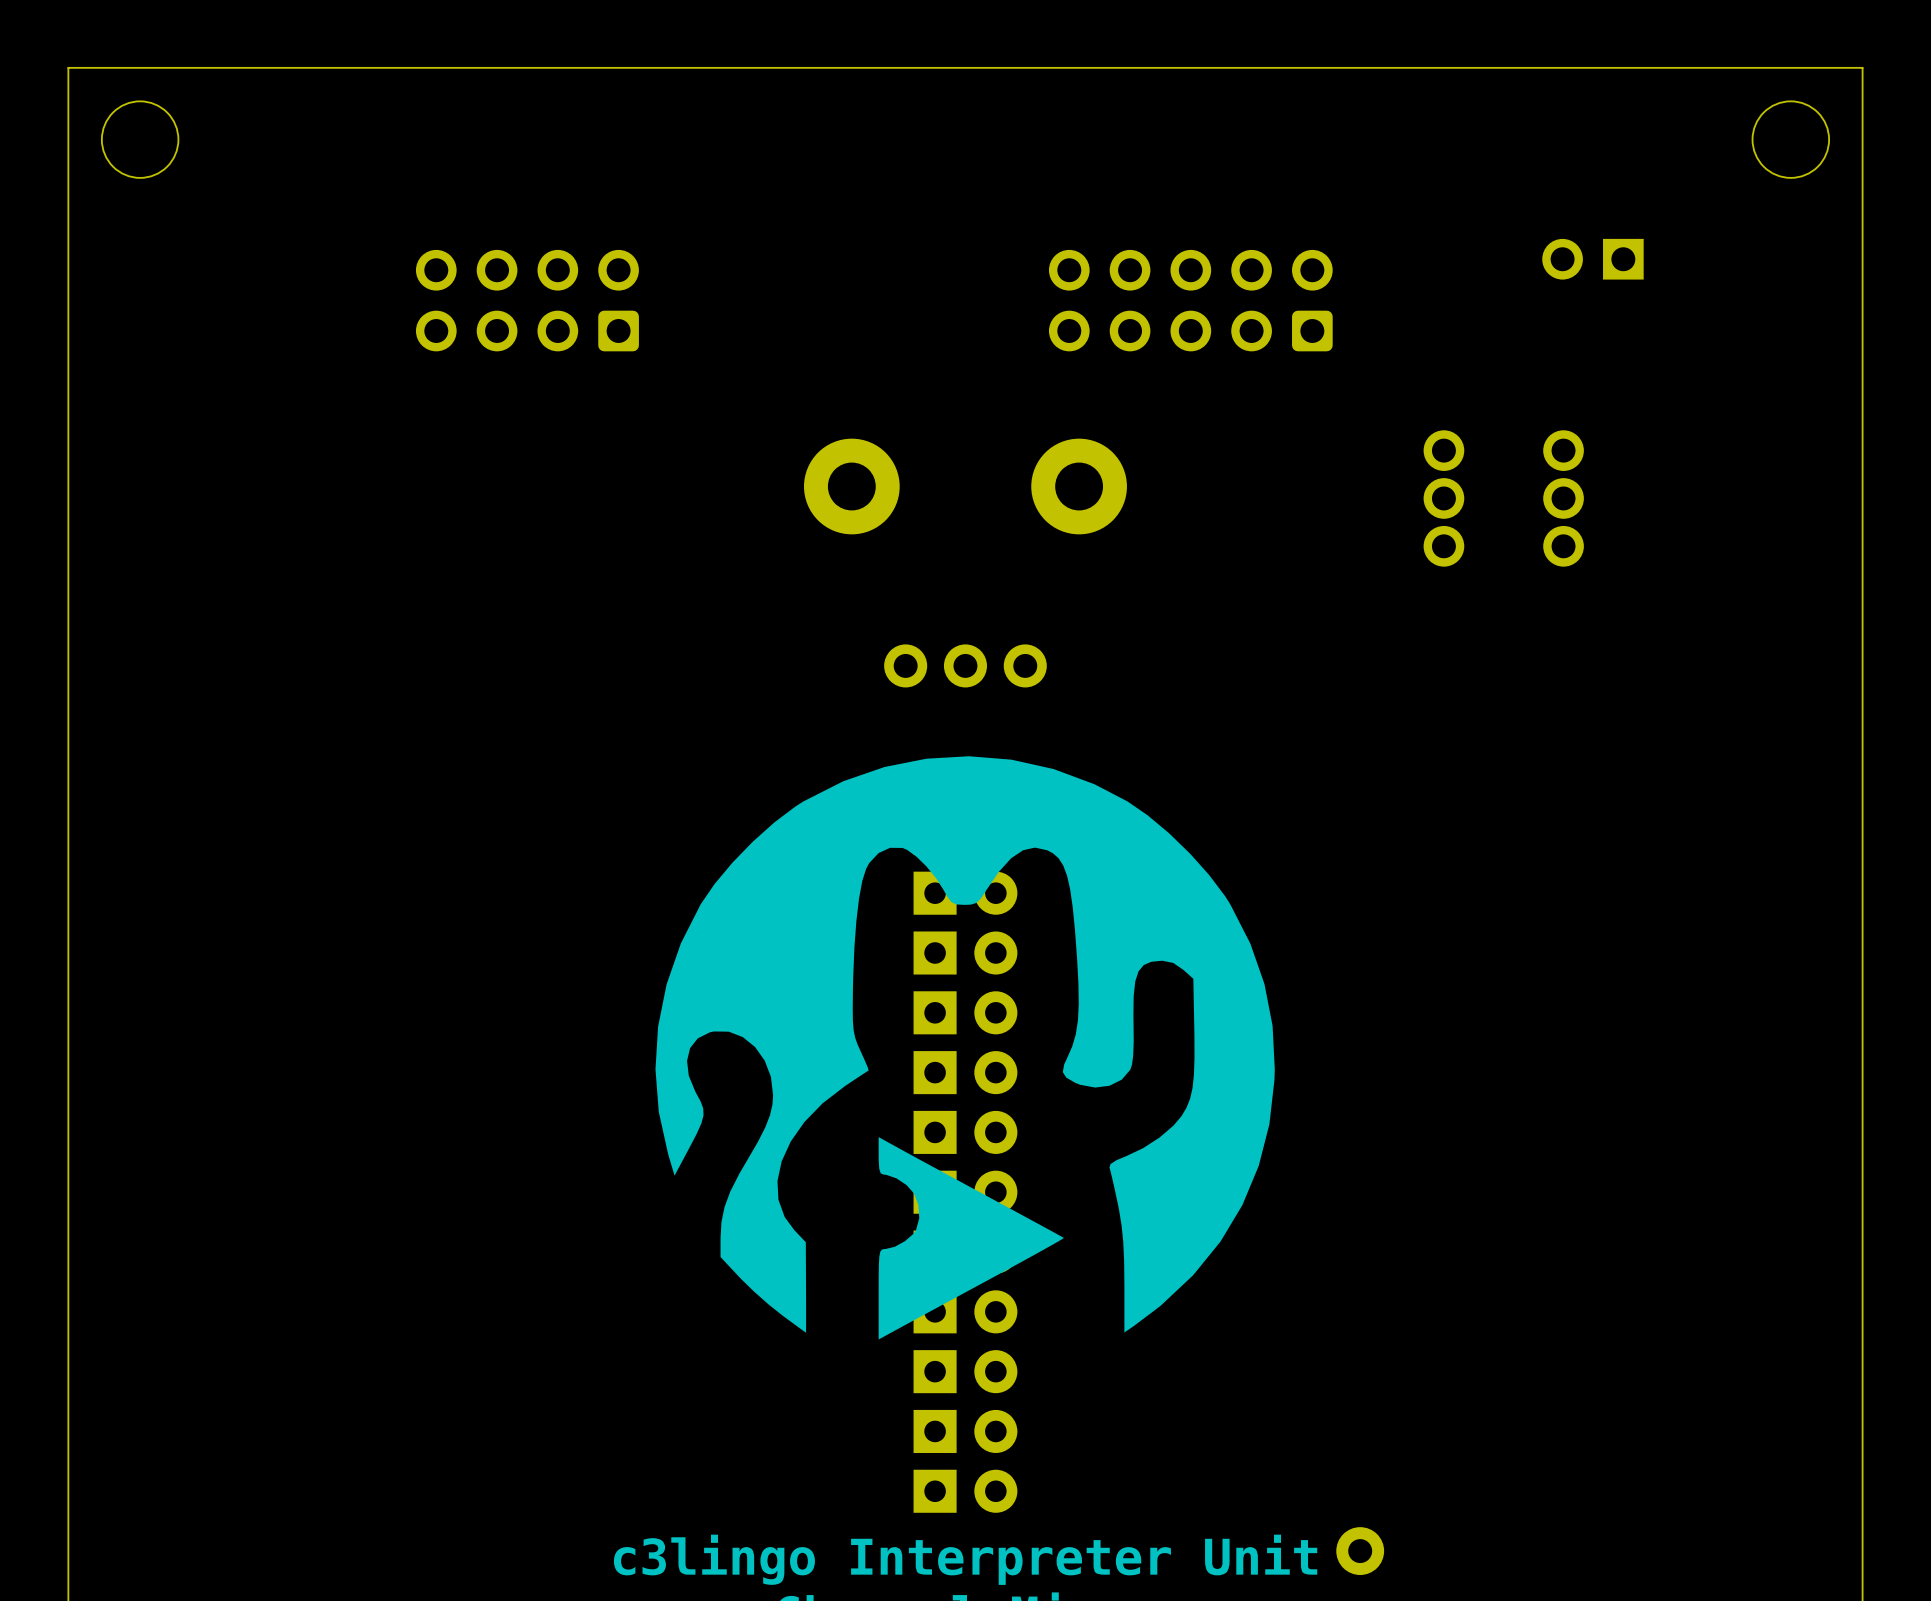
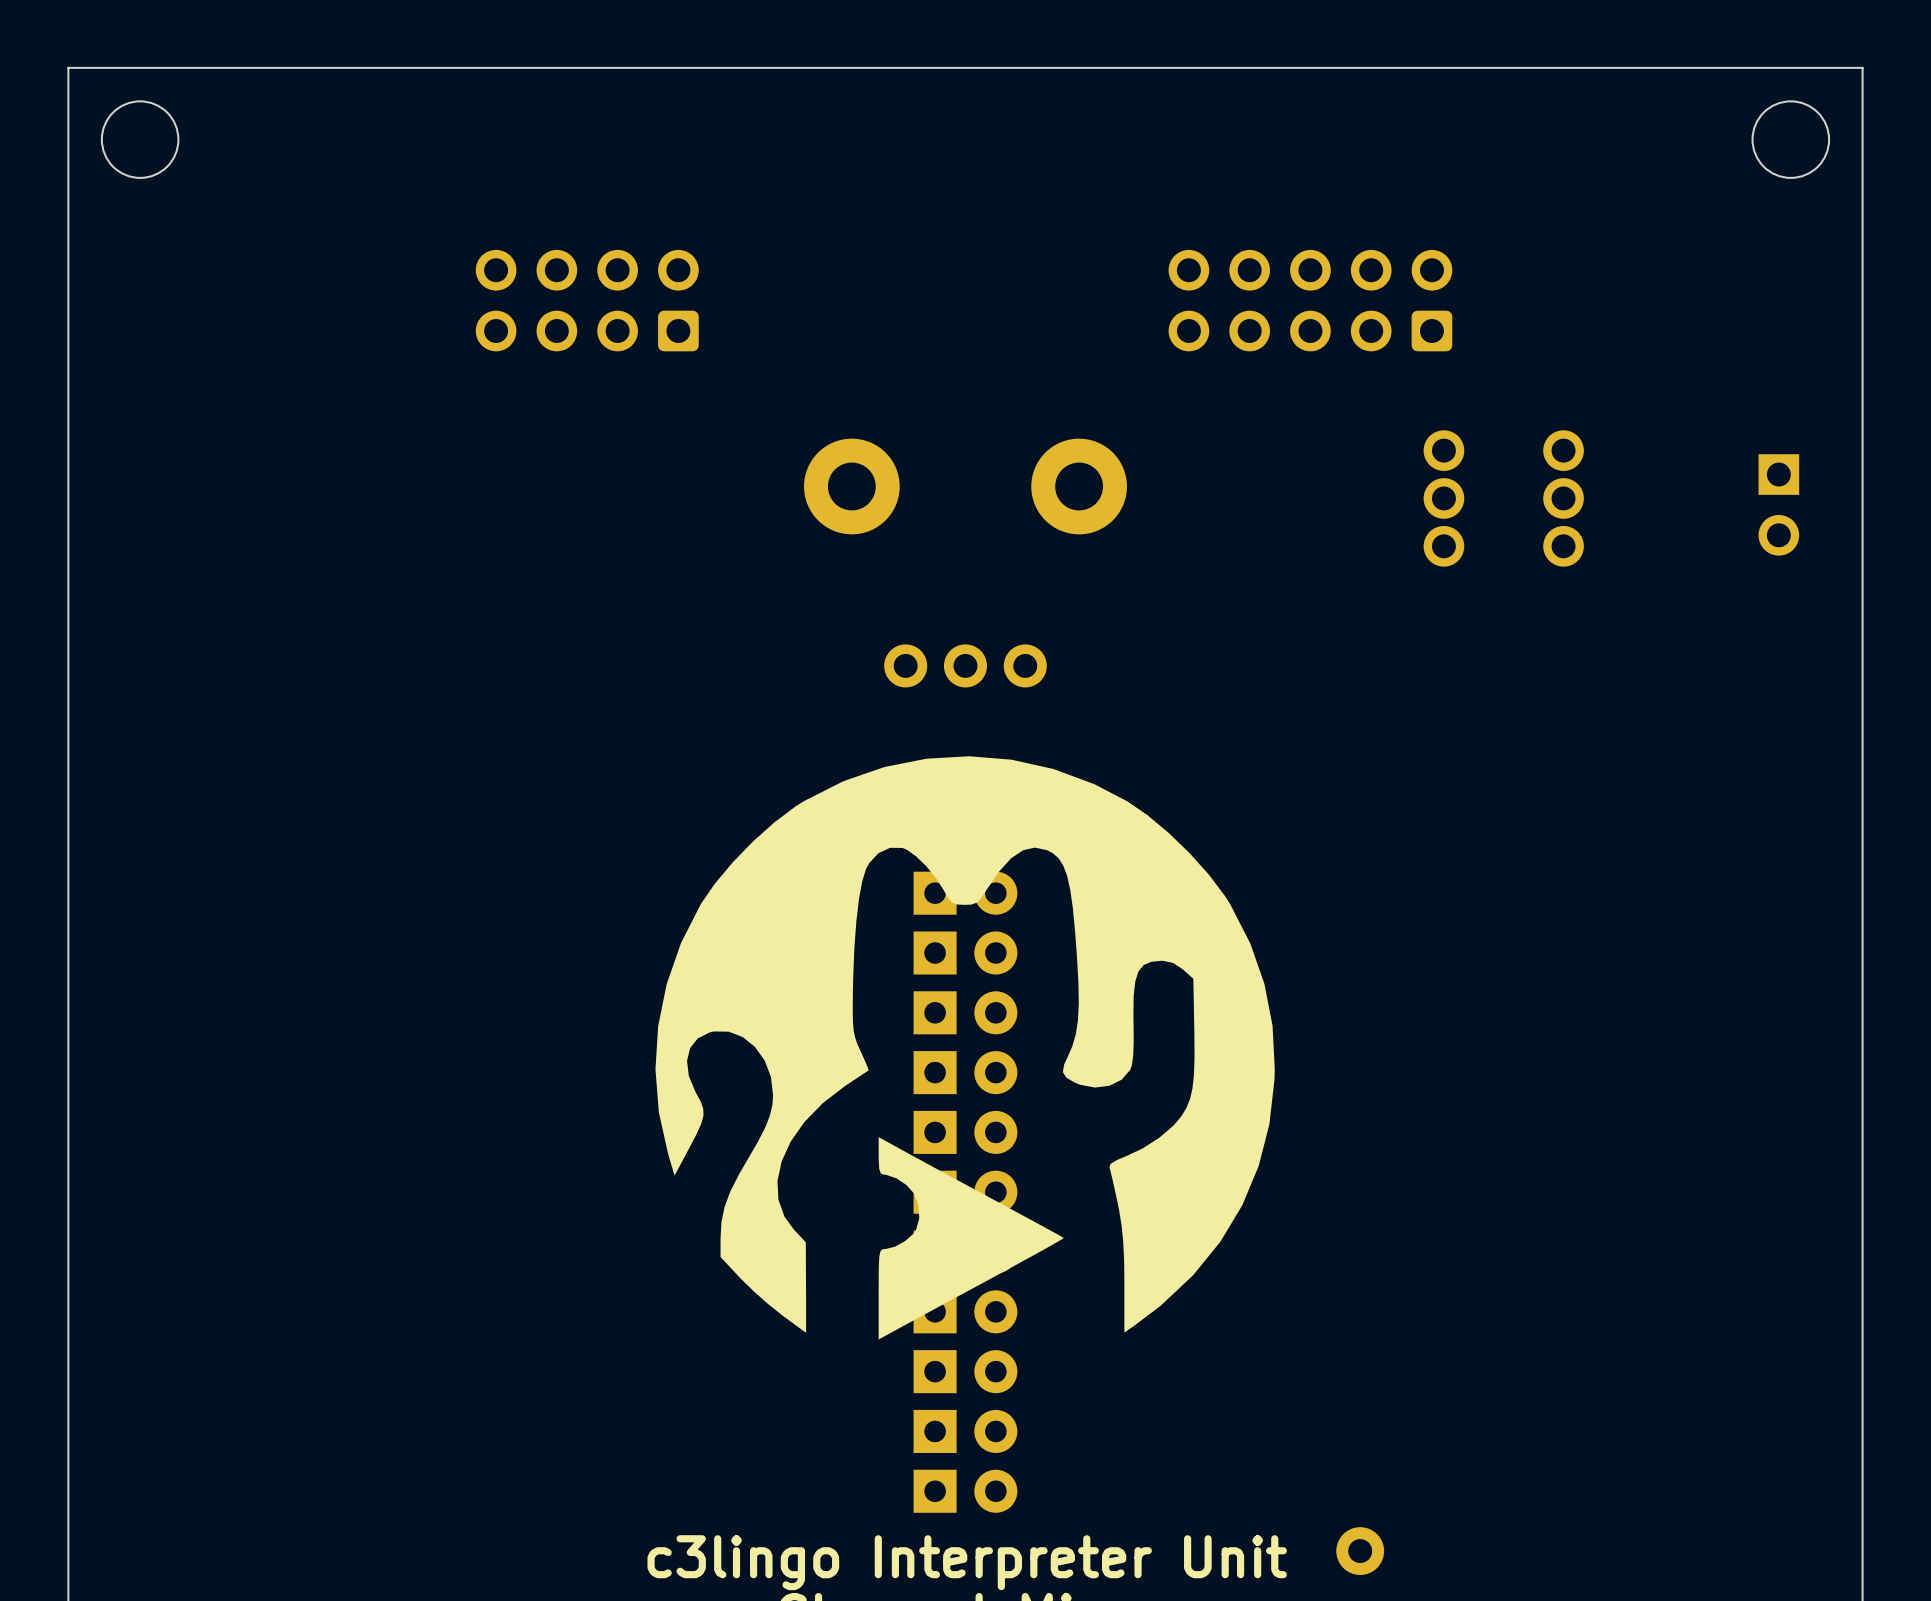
part rotation: 0° (1592, 259) -> 90° counterclockwise (1778, 504)
part position: (1592, 259) -> (1778, 504)
part position: (527, 300) -> (587, 300)
part position: (1190, 300) -> (1310, 300)

